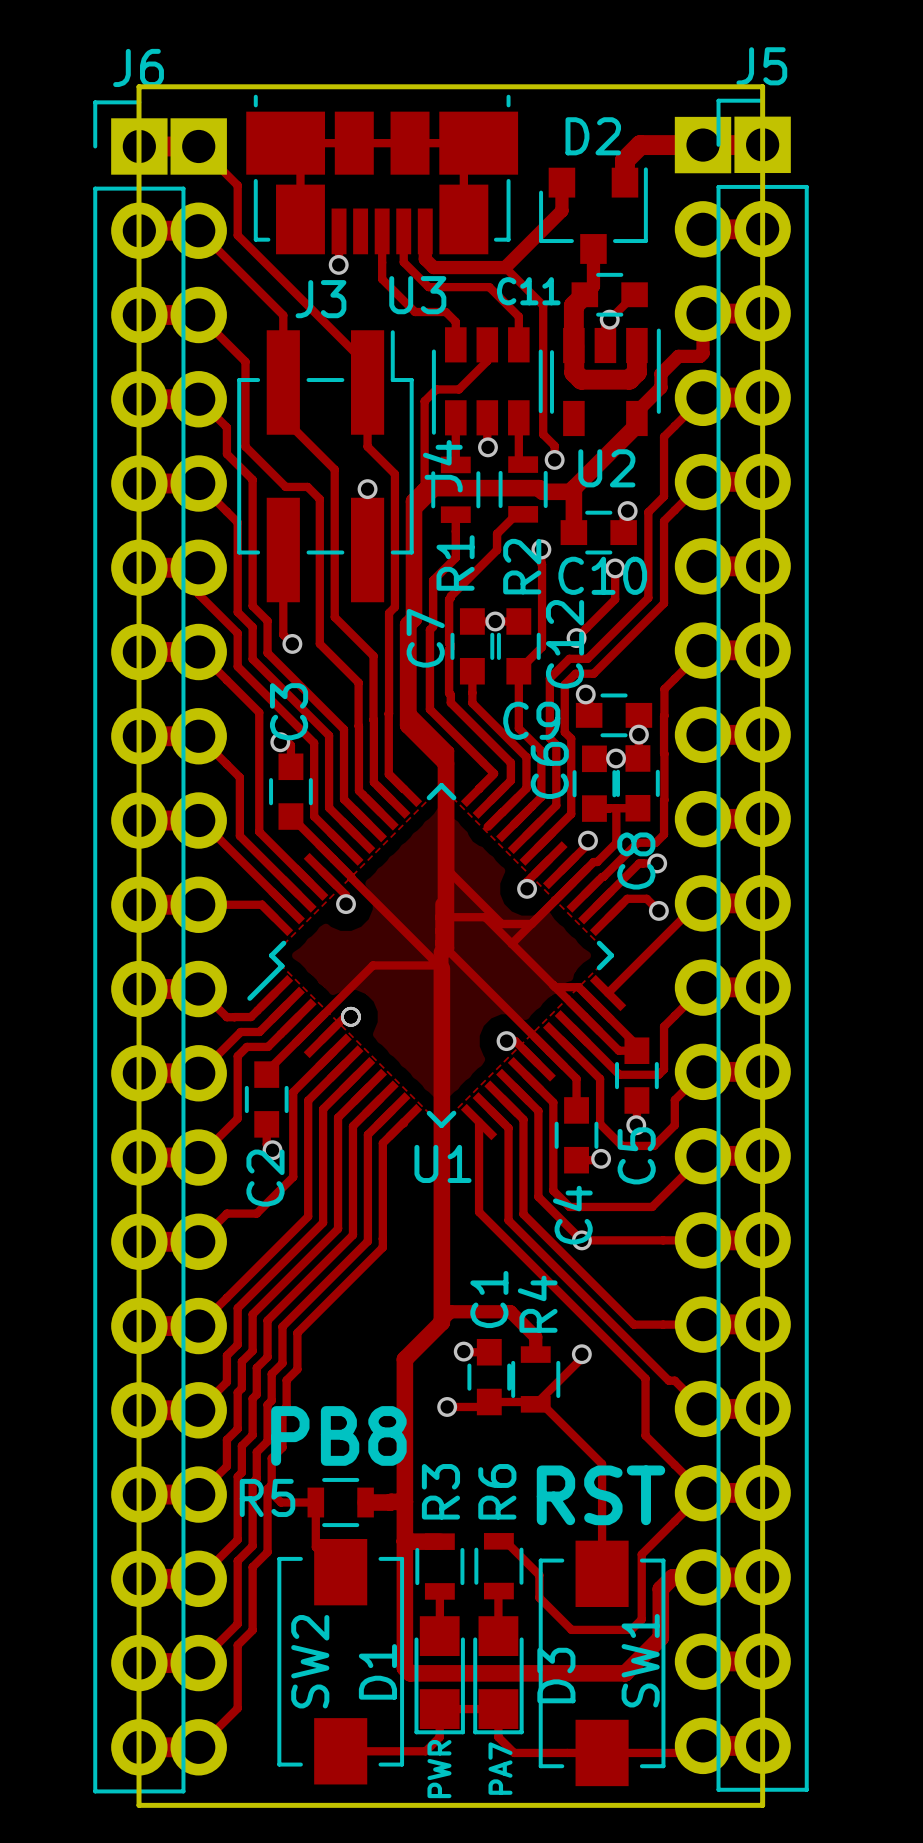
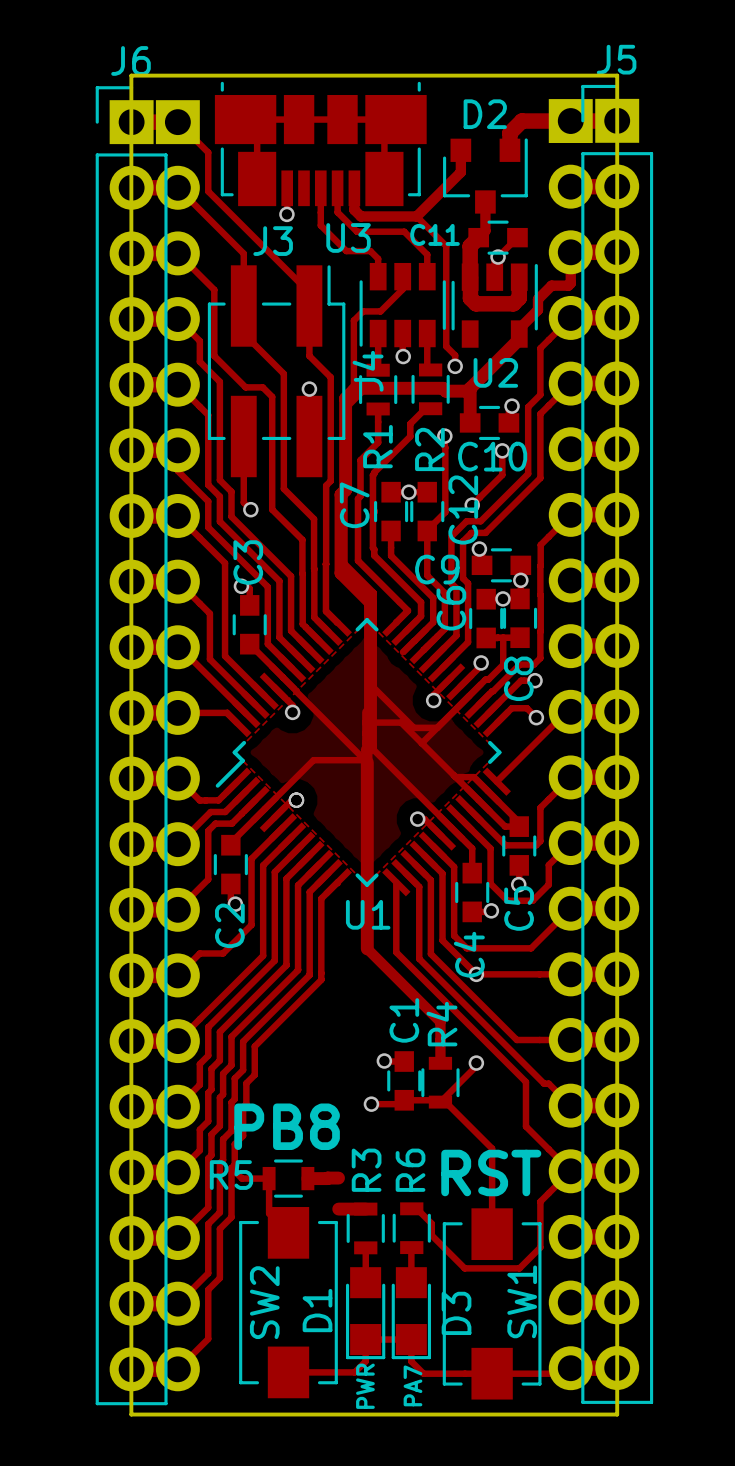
track: (441, 1207) (441, 1322) (404, 1359) (404, 1667) (410, 1673) (625, 1673) (660, 1637) (660, 1589) (672, 1577) (703, 1577) -> none
track: (441, 1320) (450, 1311) (510, 1311) (535, 1336) -> (367, 948) (440, 1021) (440, 1049)
track: (664, 1532) (641, 1554) (641, 1619) (631, 1629) (571, 1629) (539, 1597) (539, 1575) (524, 1560) -> (540, 1201) (540, 1247) (519, 1268) (464, 1268) (431, 1235) (431, 1223)

